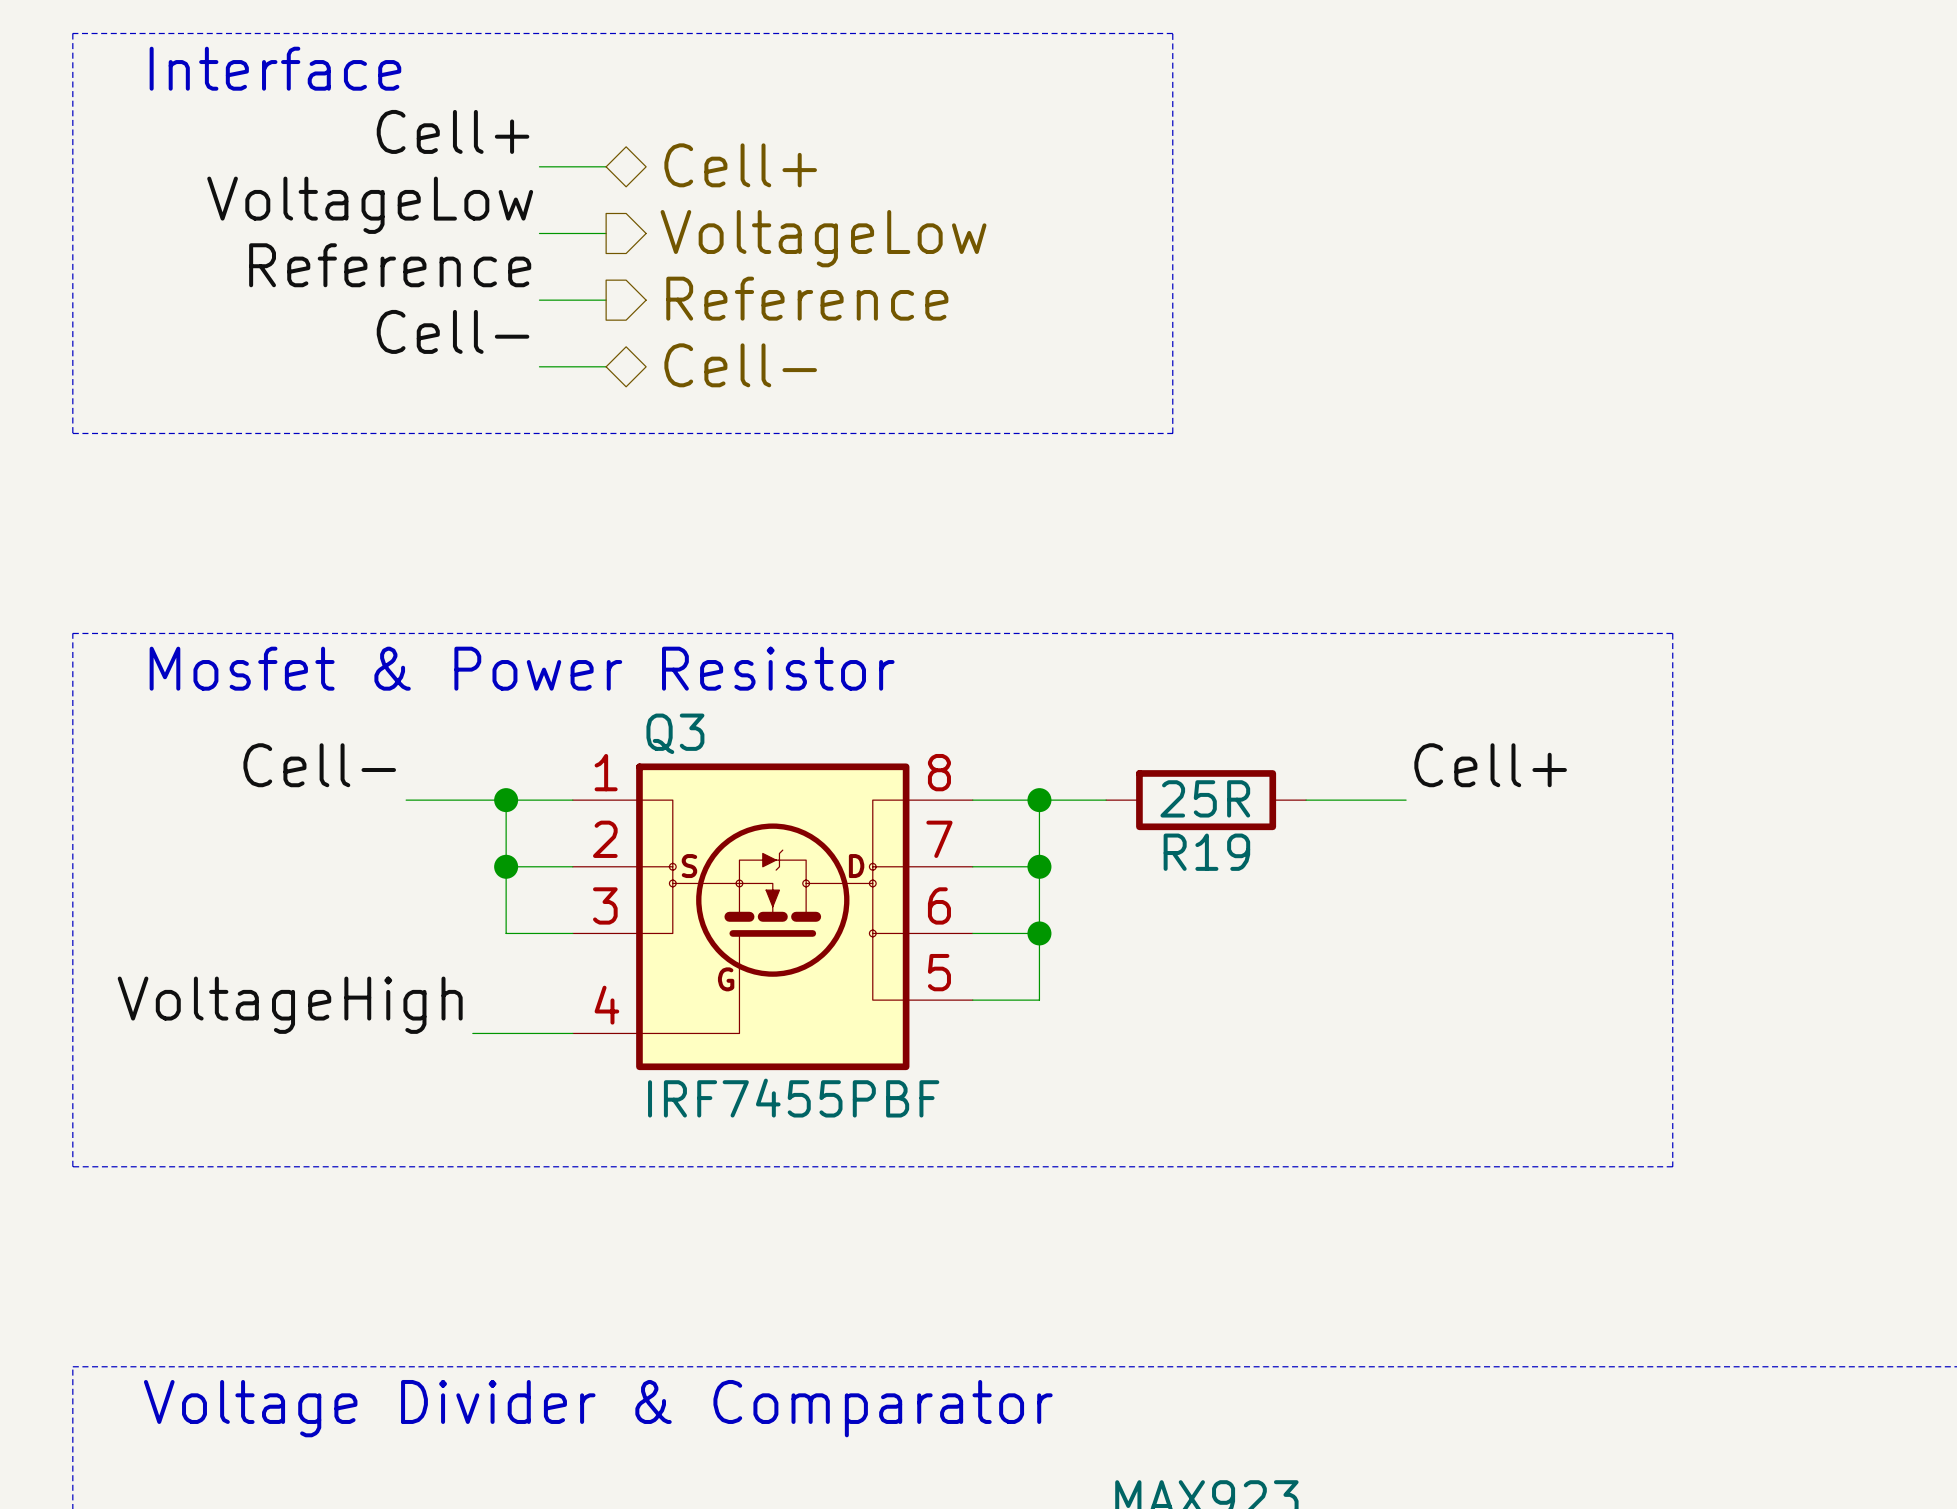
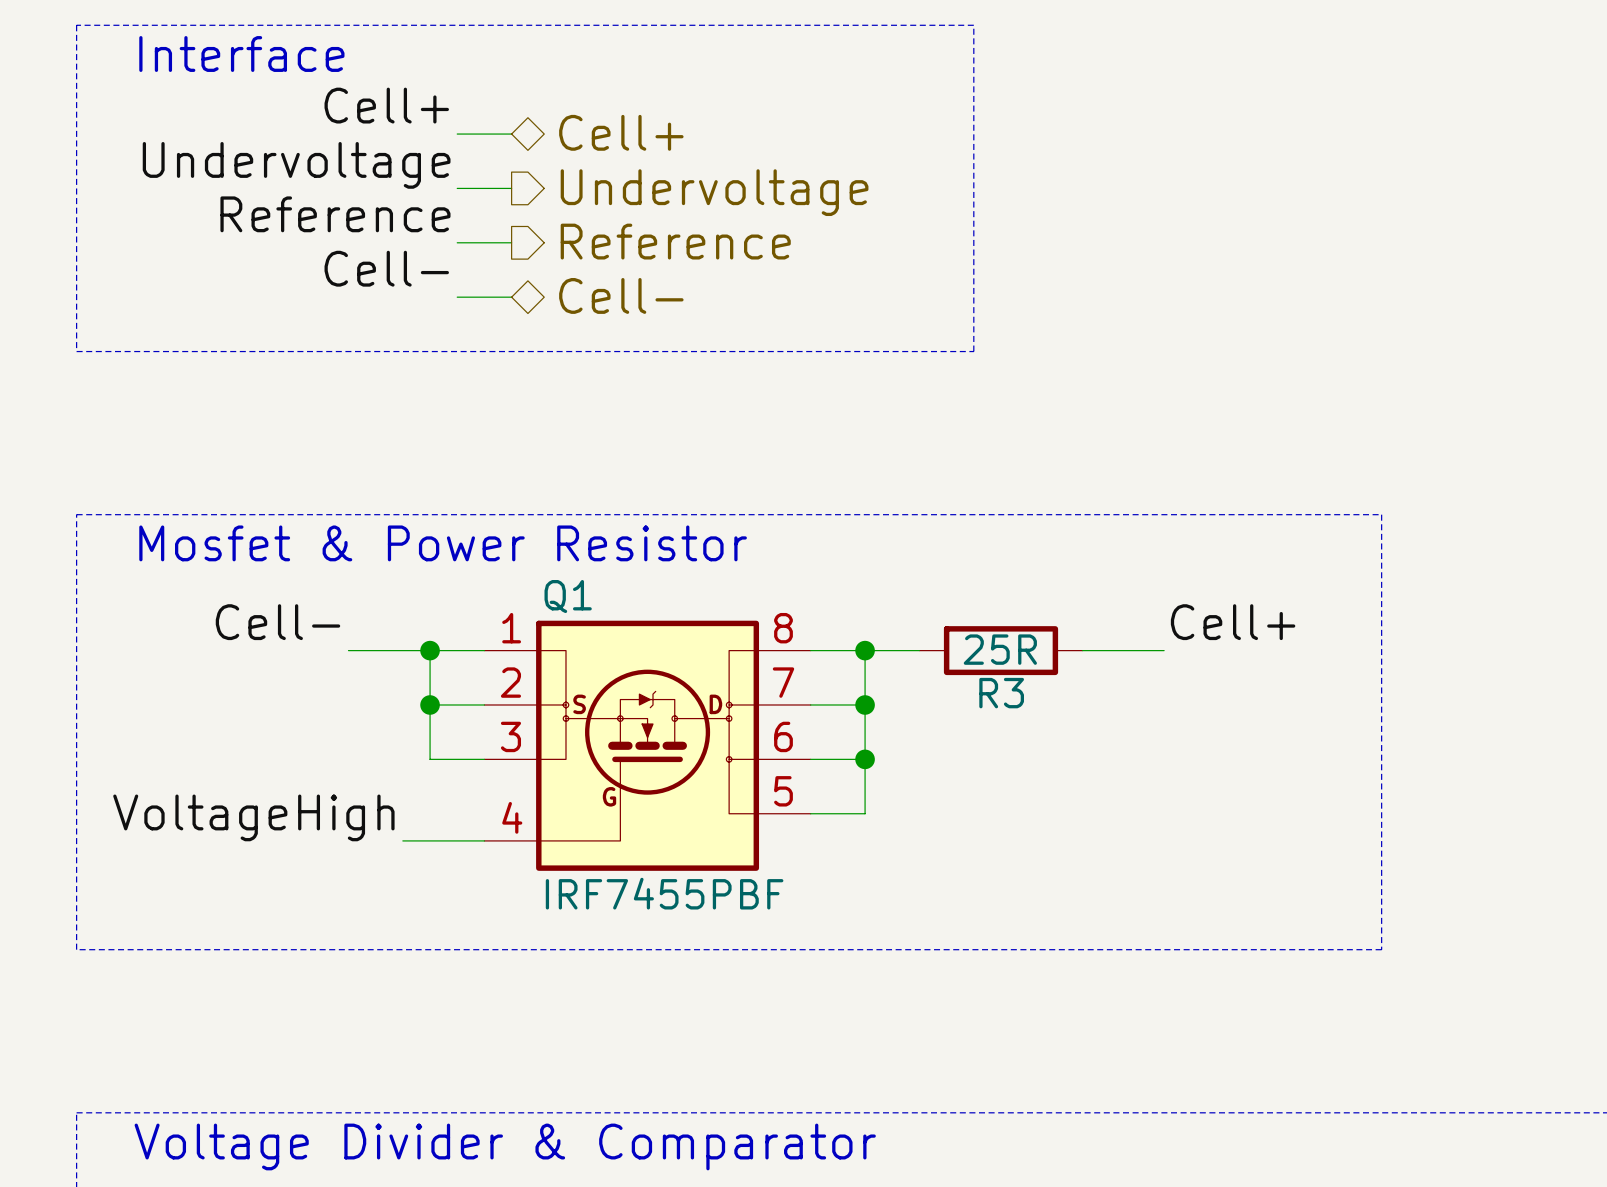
label: VoltageLow (370, 205) -> Undervoltage (296, 165)
hierarchical label: VoltageLow (823, 238) -> Undervoltage (714, 192)
Q3 name: Q3 (675, 733) -> Q1 (568, 596)
R19 name: R19 (1206, 852) -> R3 (1001, 693)

